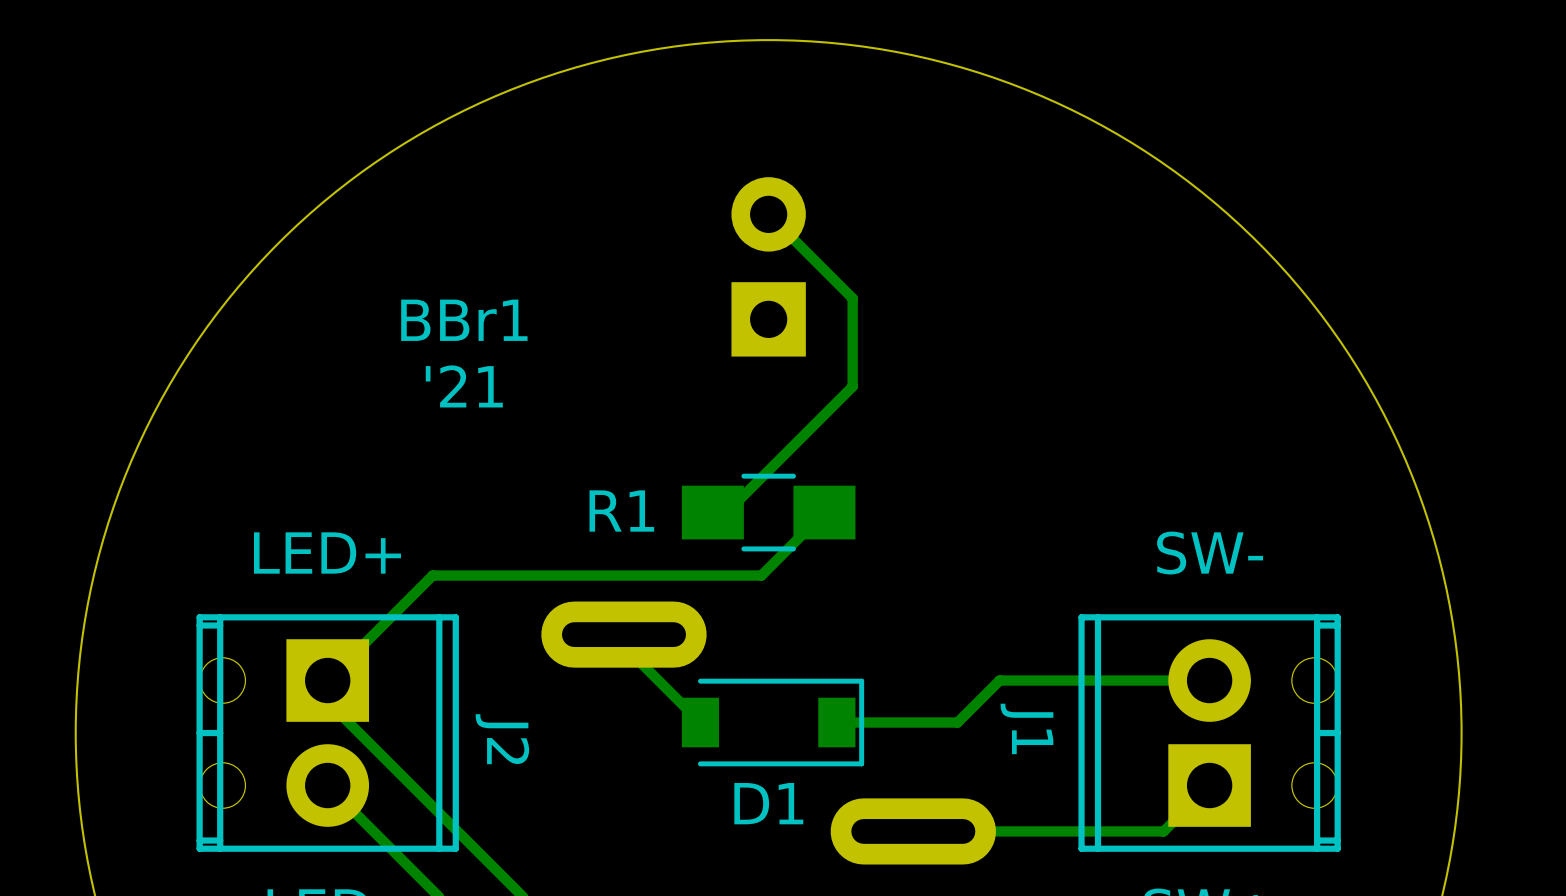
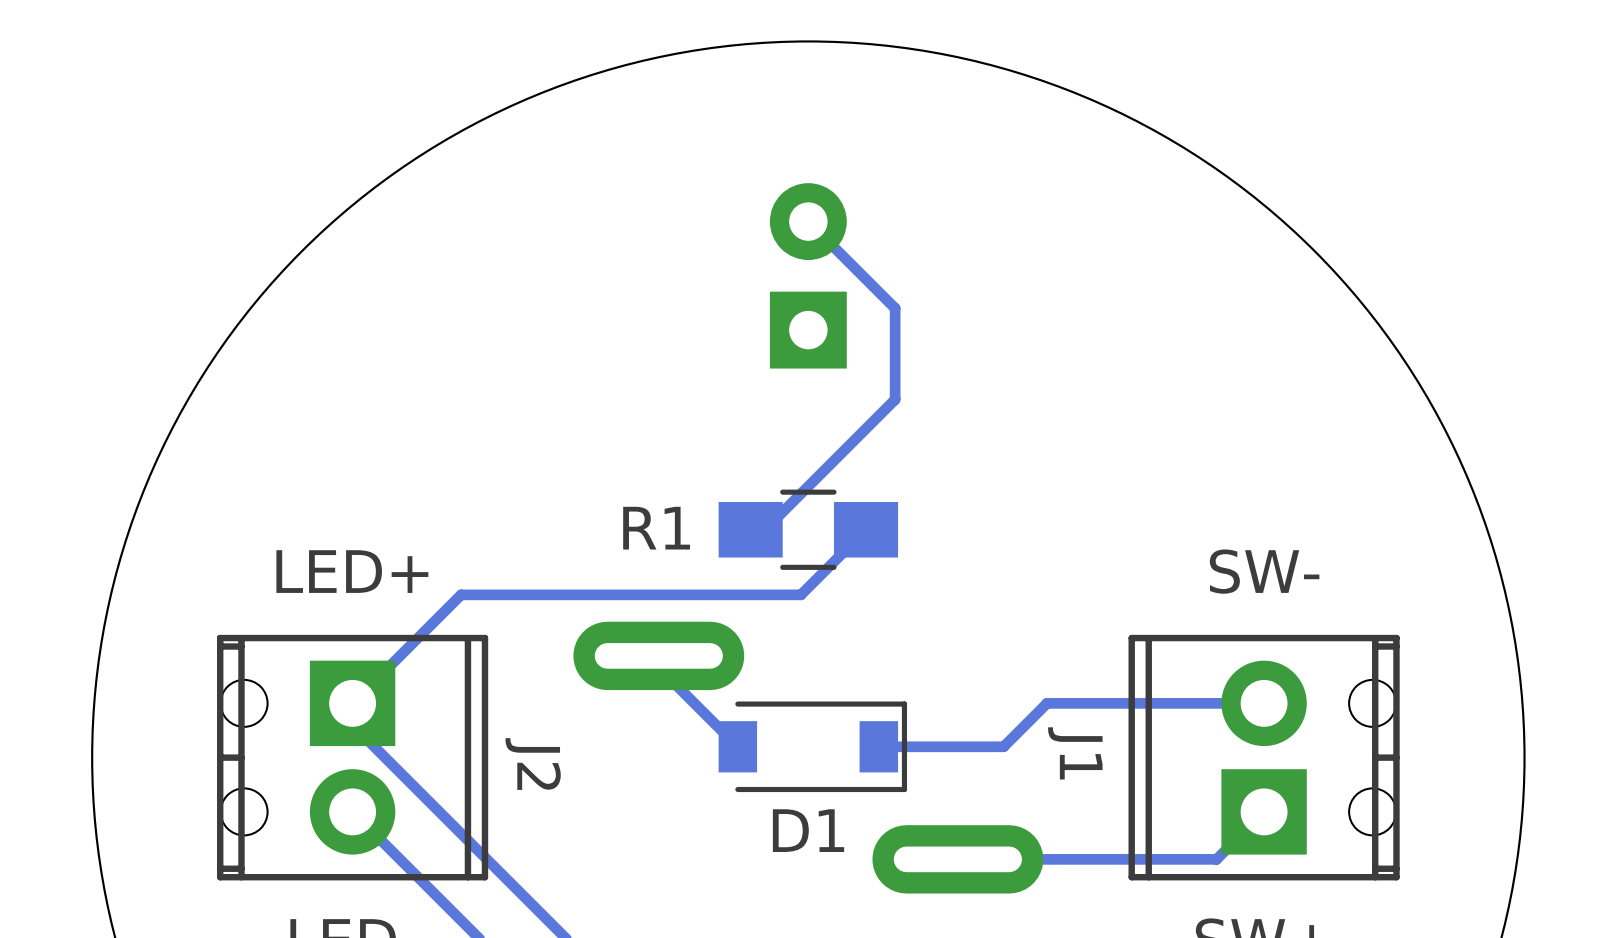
text: BBr1 (464, 320) -> none
text: '21 (464, 386) -> none

